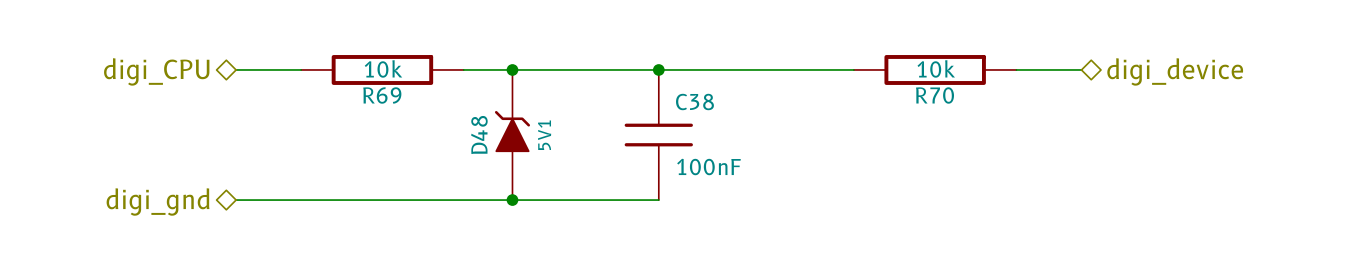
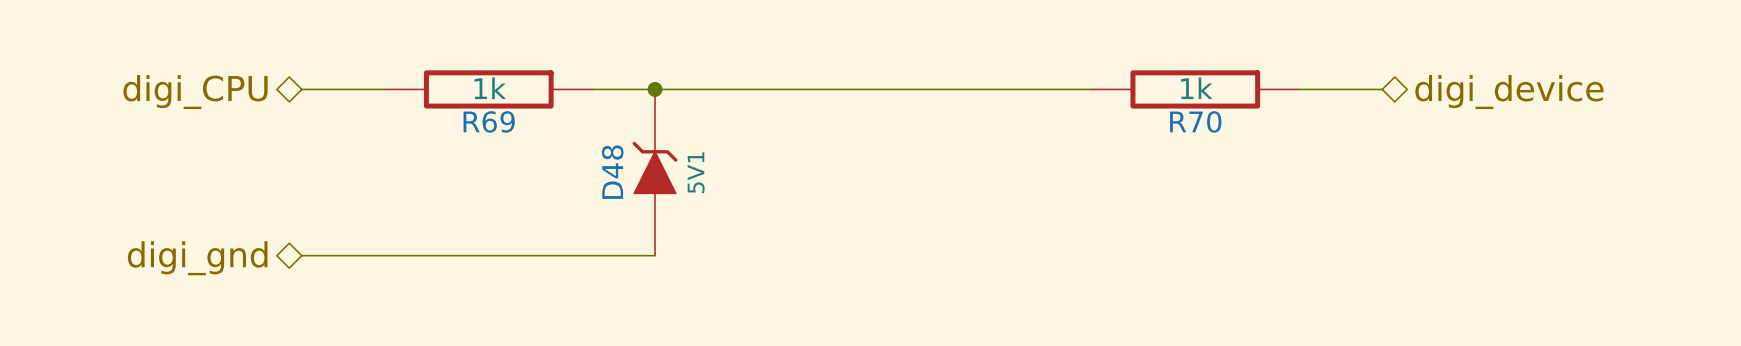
R69 value: 10k (383, 68) -> 1k (490, 88)
R70 value: 10k (936, 68) -> 1k (1196, 88)
junction: (658, 69) -> none
C38: 100nF (658, 135) -> none
wire: (512, 200) (658, 200) -> none
junction: (512, 200) -> none

